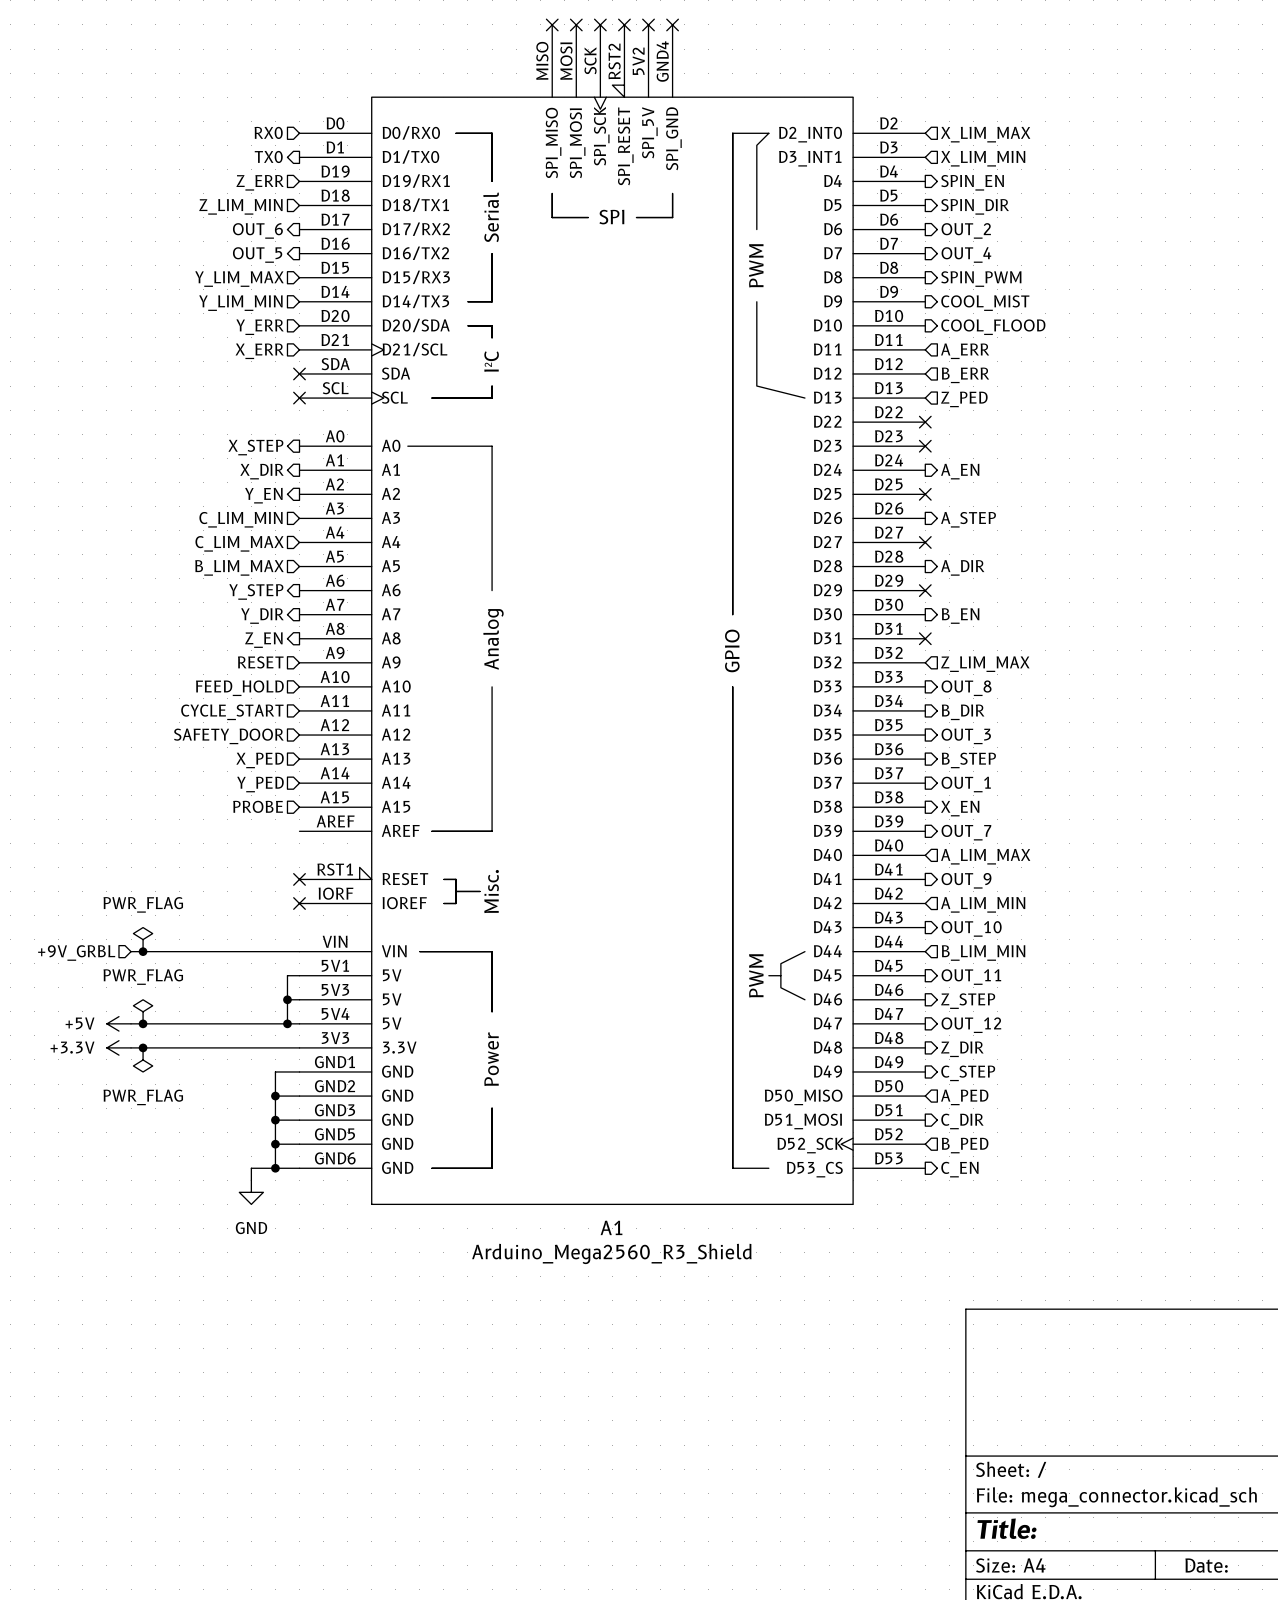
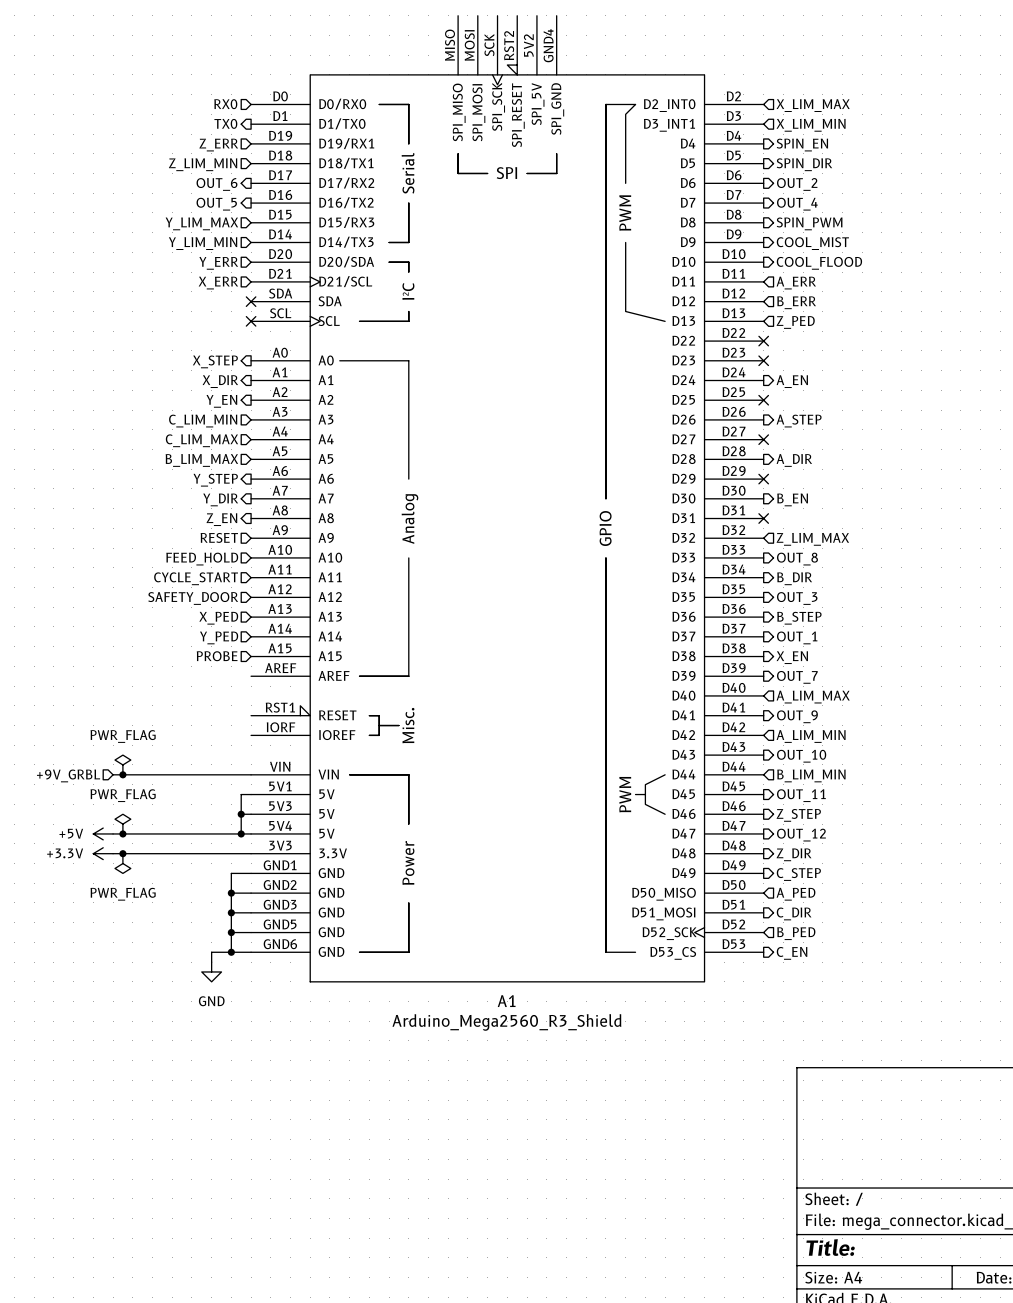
no-connect mark: (552, 24) -> none
no-connect mark: (576, 24) -> none
no-connect mark: (600, 24) -> none
no-connect mark: (624, 24) -> none
no-connect mark: (648, 24) -> none
no-connect mark: (672, 24) -> none
no-connect mark: (299, 879) -> none
no-connect mark: (299, 903) -> none

